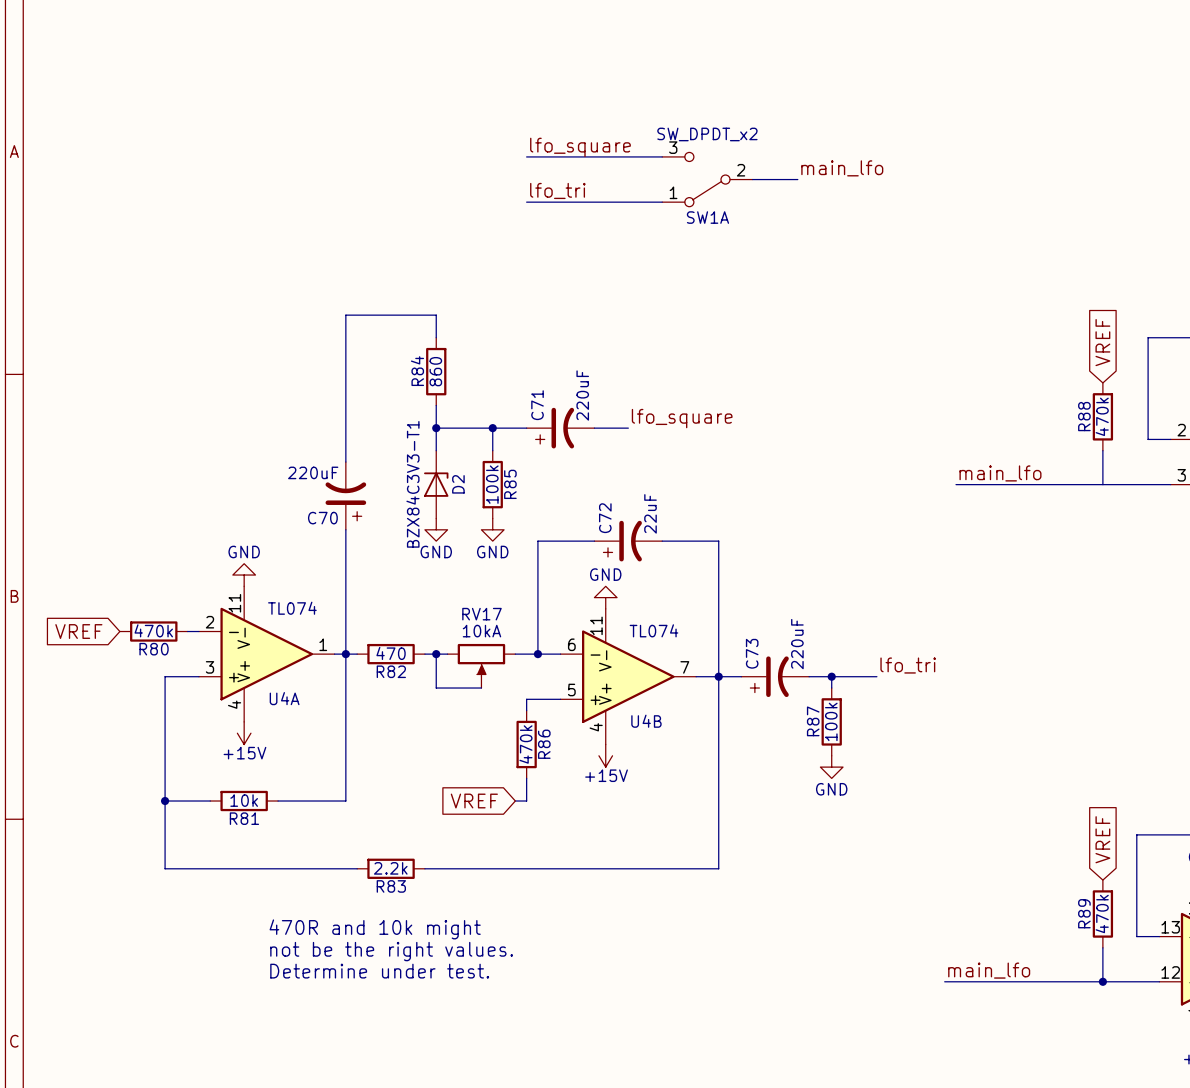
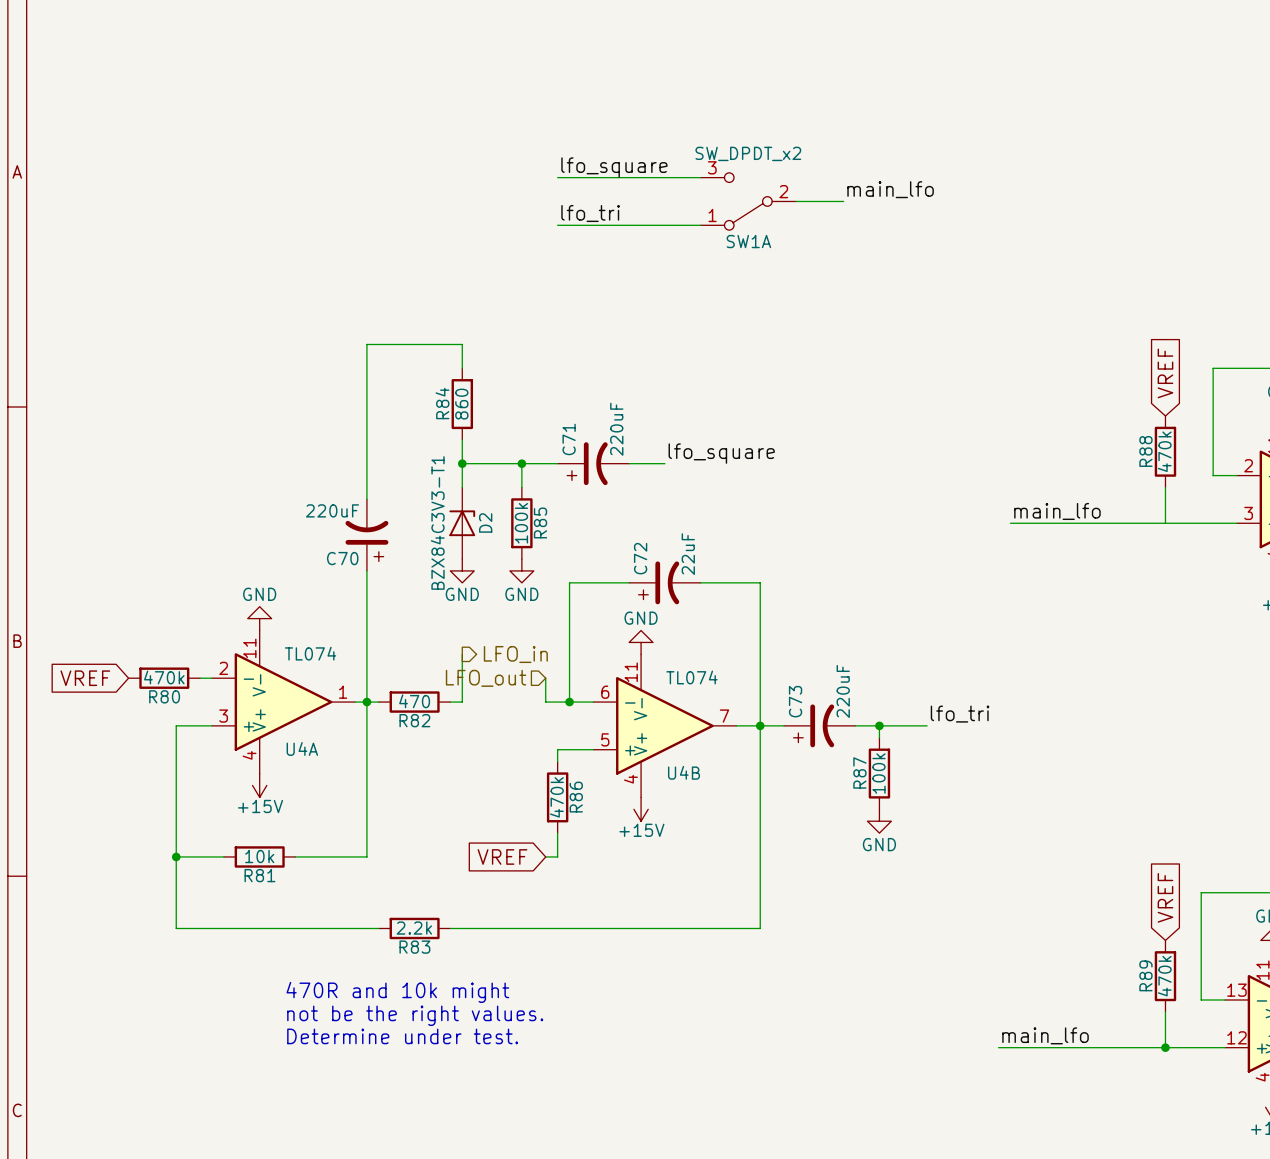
wire: none -> (462, 654) (462, 702)
hierarchical label: none -> LFO_in (515, 654)
hierarchical label: none -> LFO_out (486, 678)
wire: none -> (545, 678) (545, 702)
junction: (436, 654) -> none
wire: (447, 654) (436, 654) (436, 688) (481, 688) -> none
RV17: 10kA (481, 665) -> none

